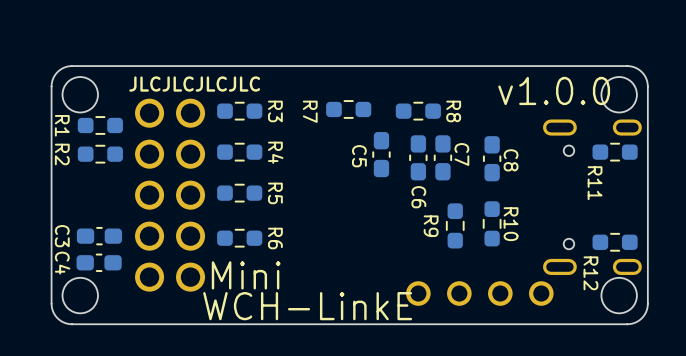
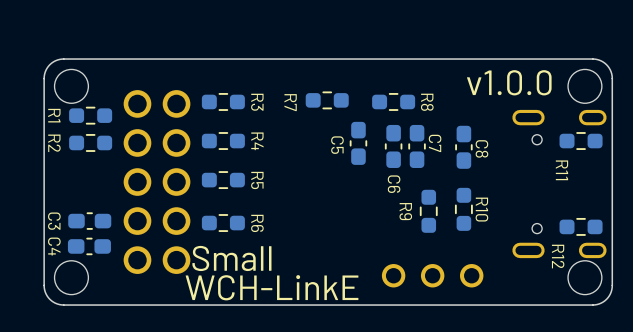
drawing: [129, 76, 261, 92] -> none
text: Mini (246, 275) -> Small (231, 258)
part: (541, 293) -> none

